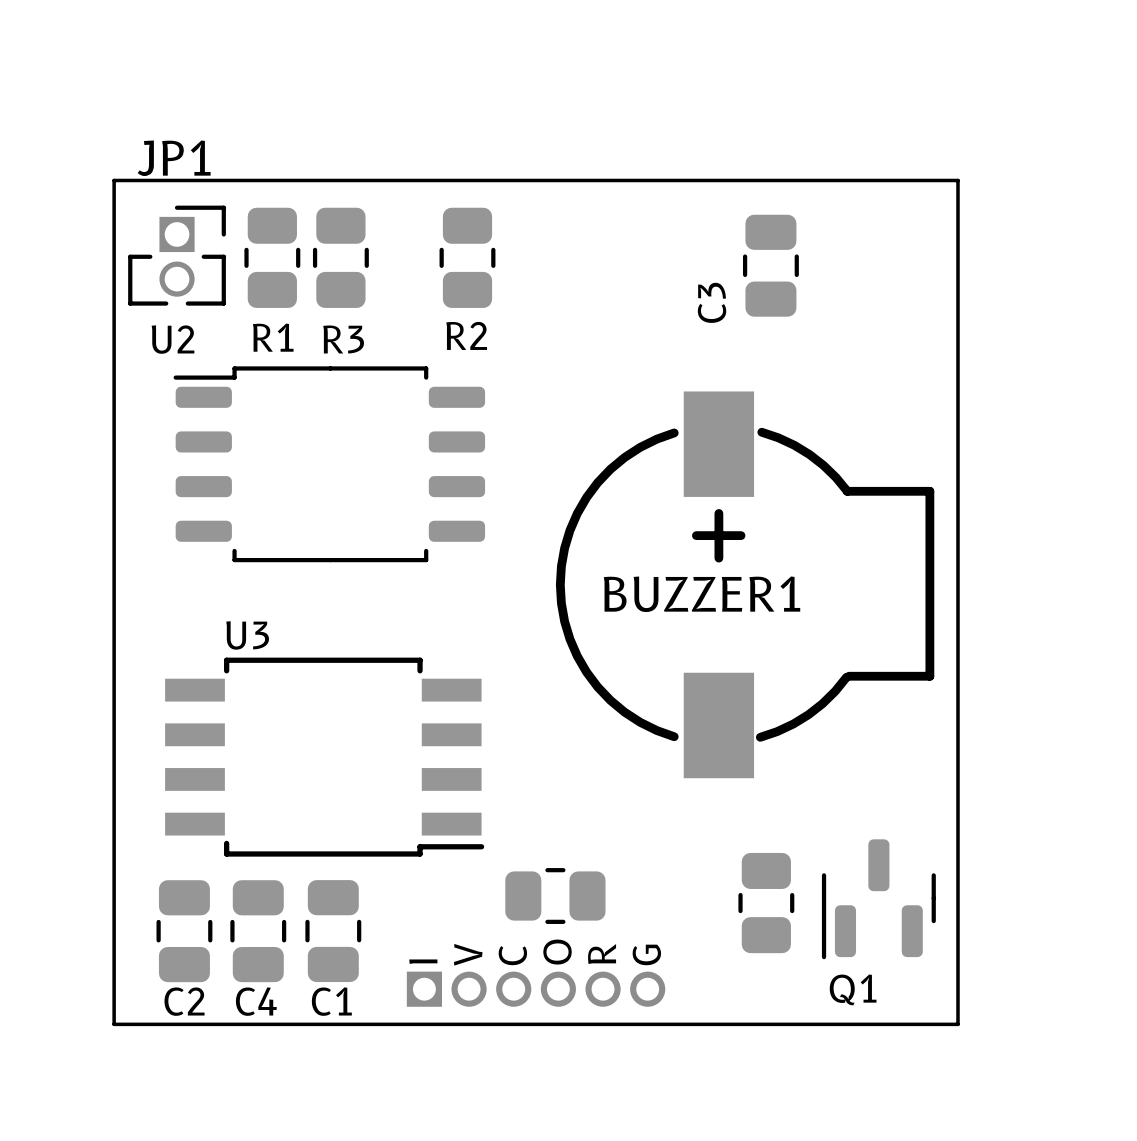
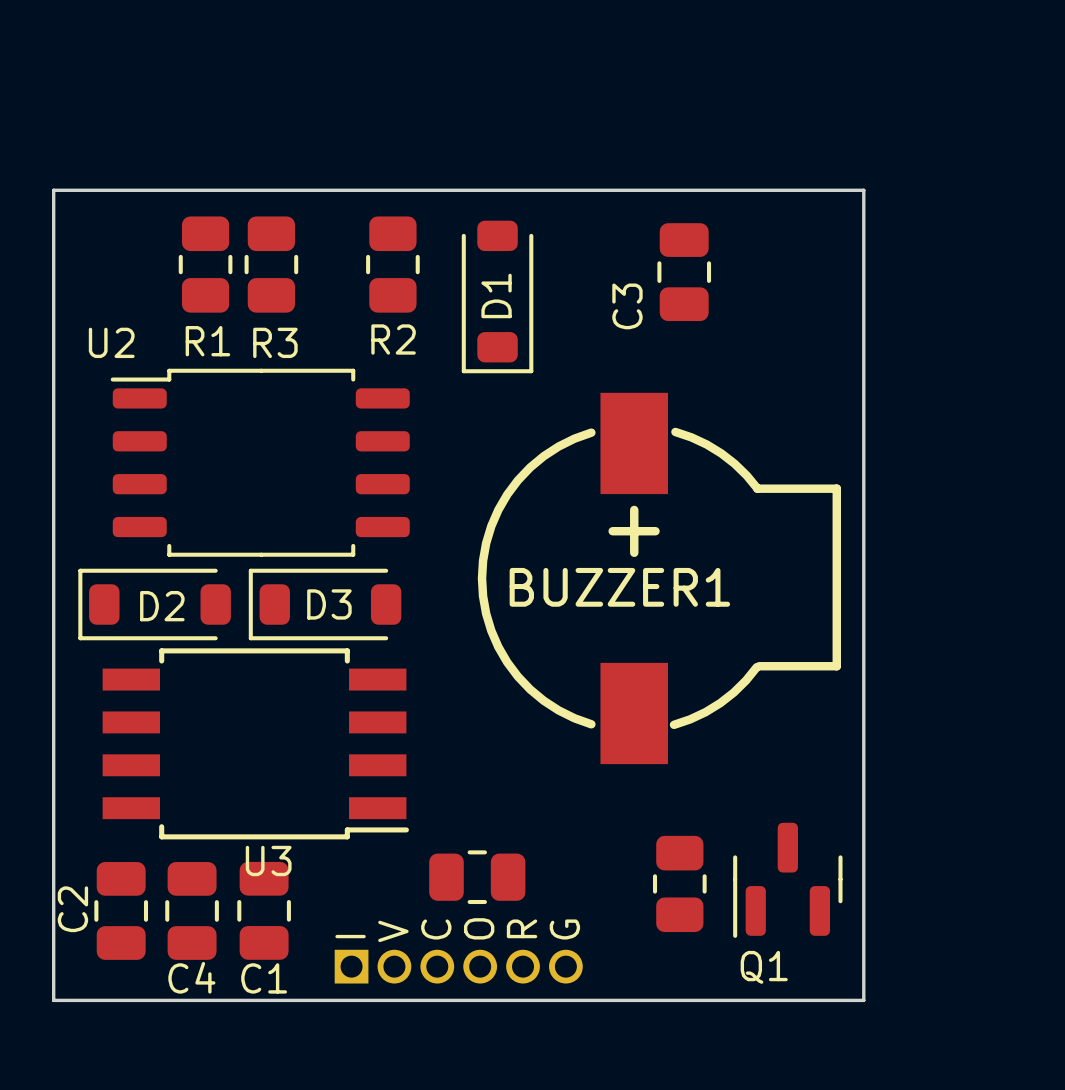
JP1: (177, 255) -> none
D1: none -> (497, 296)
D2: none -> (154, 604)
D3: none -> (325, 604)
U3 name position: U3 (247, 635) -> U3 (268, 860)
C2 name rotation: 0° (184, 1001) -> 90° counterclockwise (72, 909)
C2 name position: C2 (184, 1001) -> C2 (72, 909)

